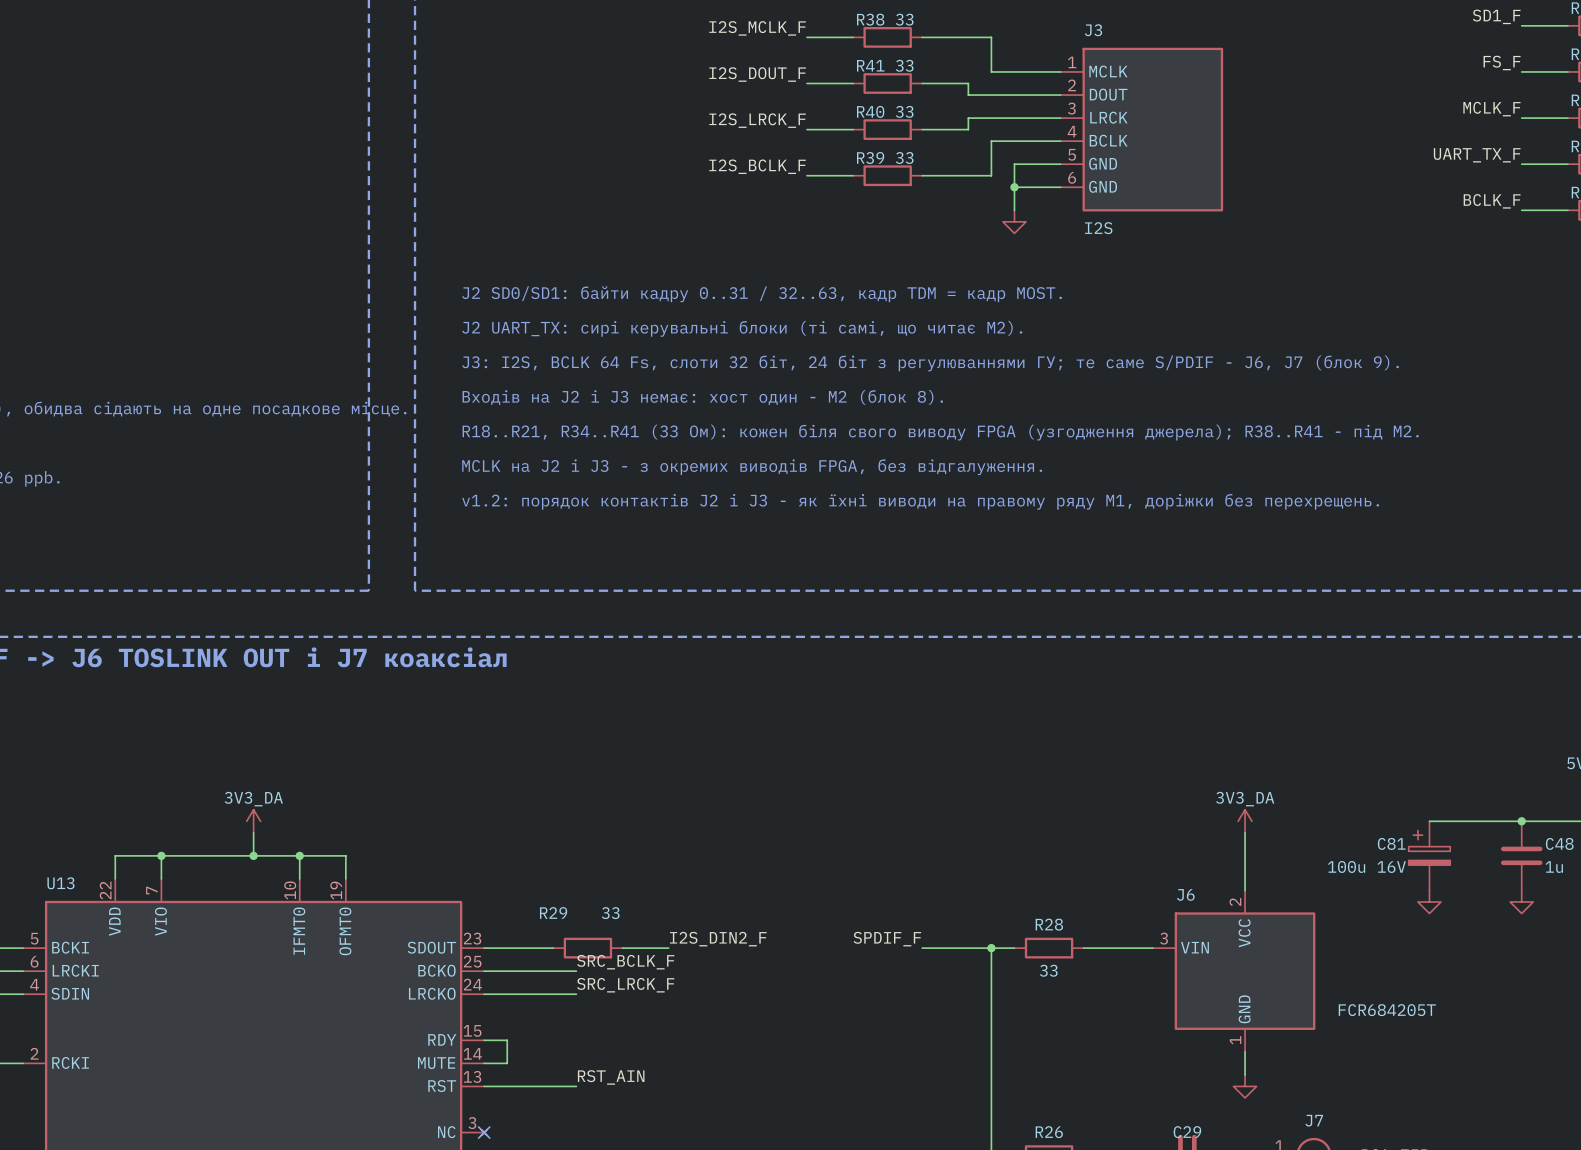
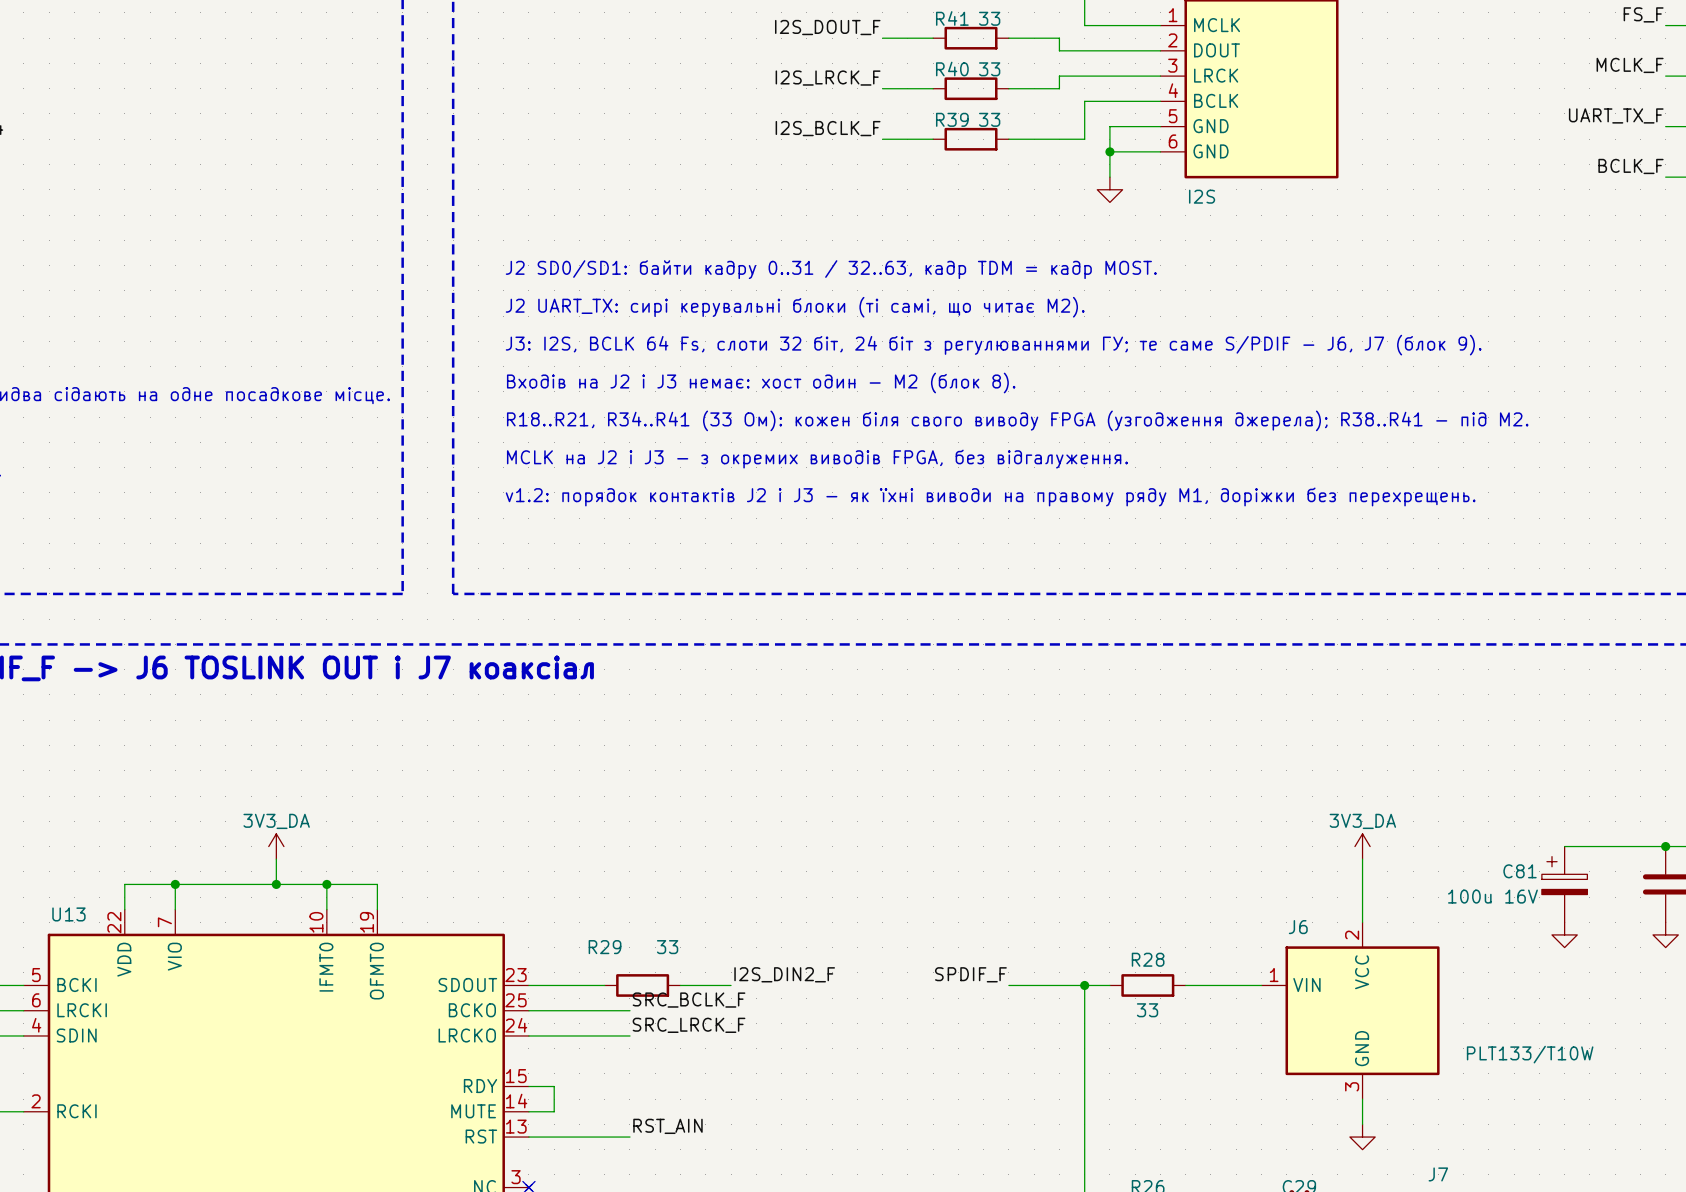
J6 pin number: 3 (1164, 938) -> 1 (1274, 975)
J6 value: FCR684205T (1387, 1010) -> PLT133/T10W (1530, 1054)
J6 pin number: 1 (1235, 1040) -> 3 (1352, 1086)

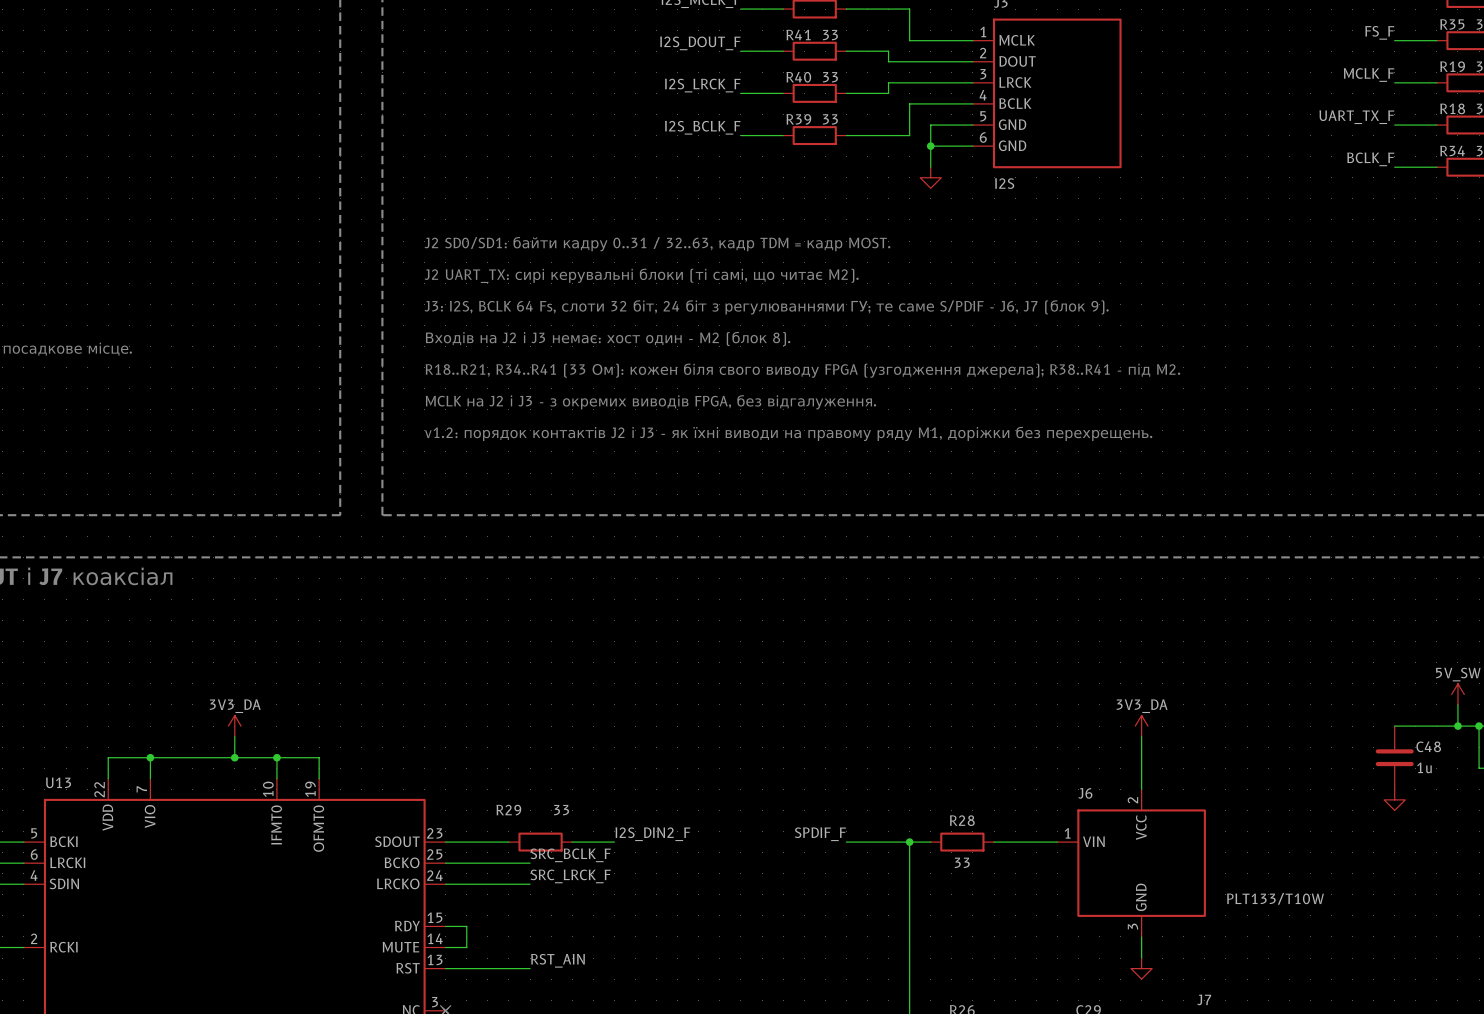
wire: (1564, 846) (1665, 846) -> none
junction: (1665, 846) -> none
C81: 100u 16V (1564, 884) -> none
power symbol: (1564, 934) -> none

